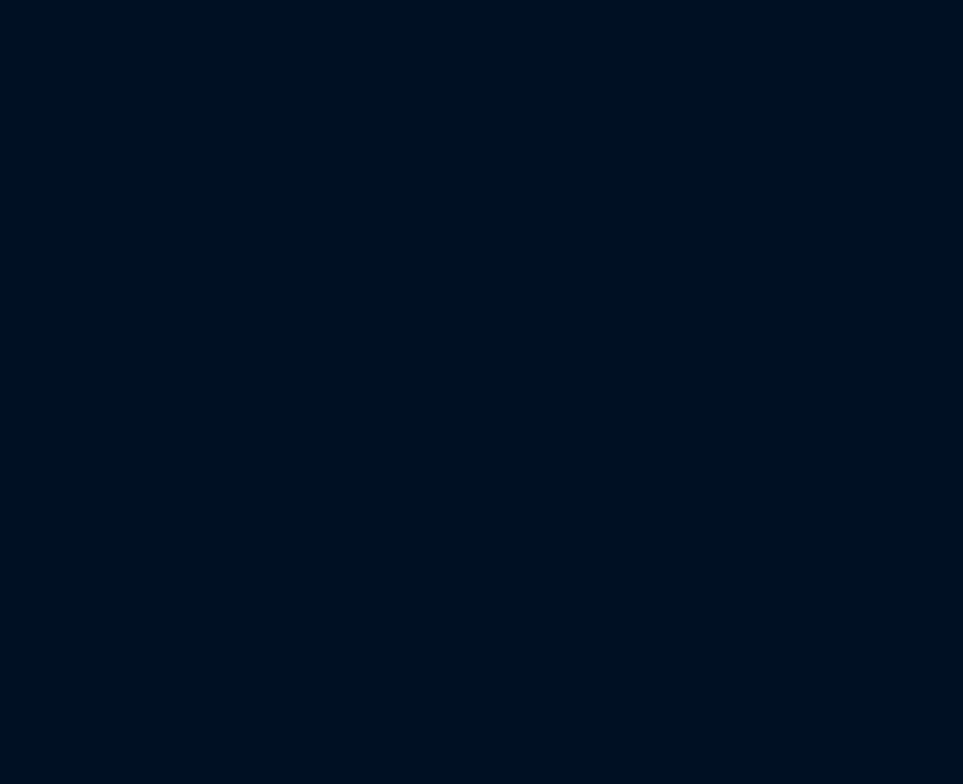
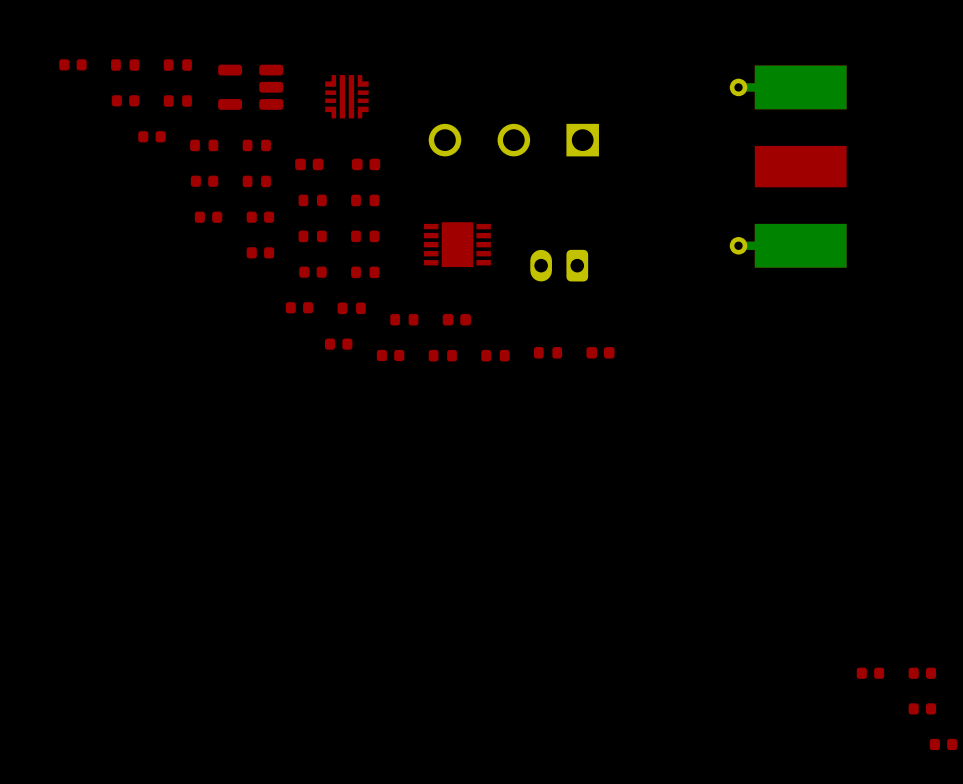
part: none -> (72, 64)
part: none -> (125, 65)
part: none -> (177, 65)
part: none -> (250, 87)
part: none -> (346, 96)
part: none -> (125, 100)
part: none -> (177, 100)
part: none -> (151, 136)
part: none -> (513, 140)
part: none -> (204, 145)
part: none -> (256, 145)
part: none -> (309, 164)
part: none -> (366, 164)
part: none -> (788, 166)
part: none -> (204, 181)
part: none -> (256, 181)
part: none -> (312, 200)
part: none -> (365, 200)
part: none -> (208, 217)
part: none -> (260, 217)
part: none -> (312, 236)
part: none -> (365, 236)
part: none -> (457, 244)
part: none -> (260, 252)
part: none -> (559, 265)
part: none -> (313, 272)
part: none -> (365, 272)
part: none -> (299, 307)
part: none -> (351, 308)
part: none -> (404, 319)
part: none -> (456, 319)
part: none -> (338, 344)
part: none -> (548, 352)
part: none -> (600, 352)
part: none -> (390, 355)
part: none -> (442, 355)
part: none -> (495, 355)
part: none -> (870, 673)
part: none -> (922, 673)
part: none -> (922, 708)
part: none -> (943, 744)

